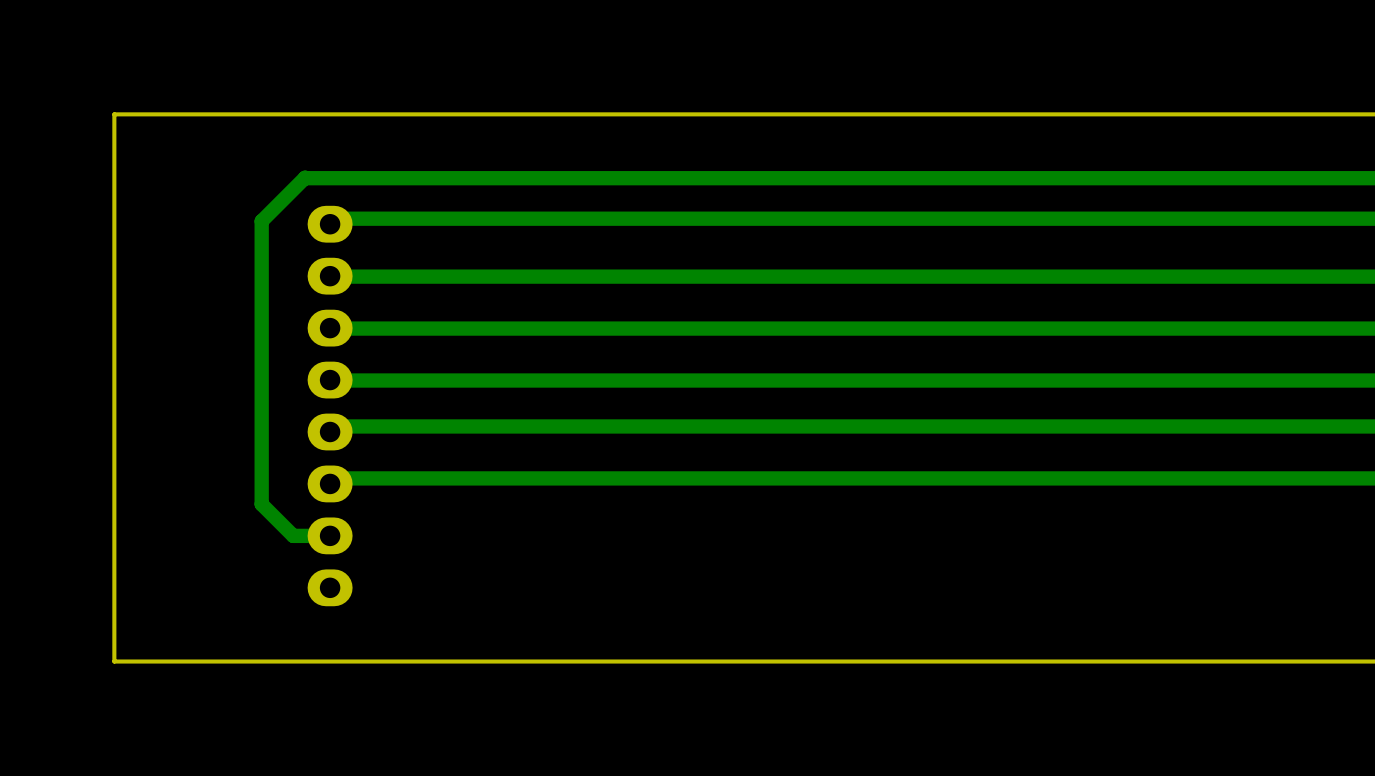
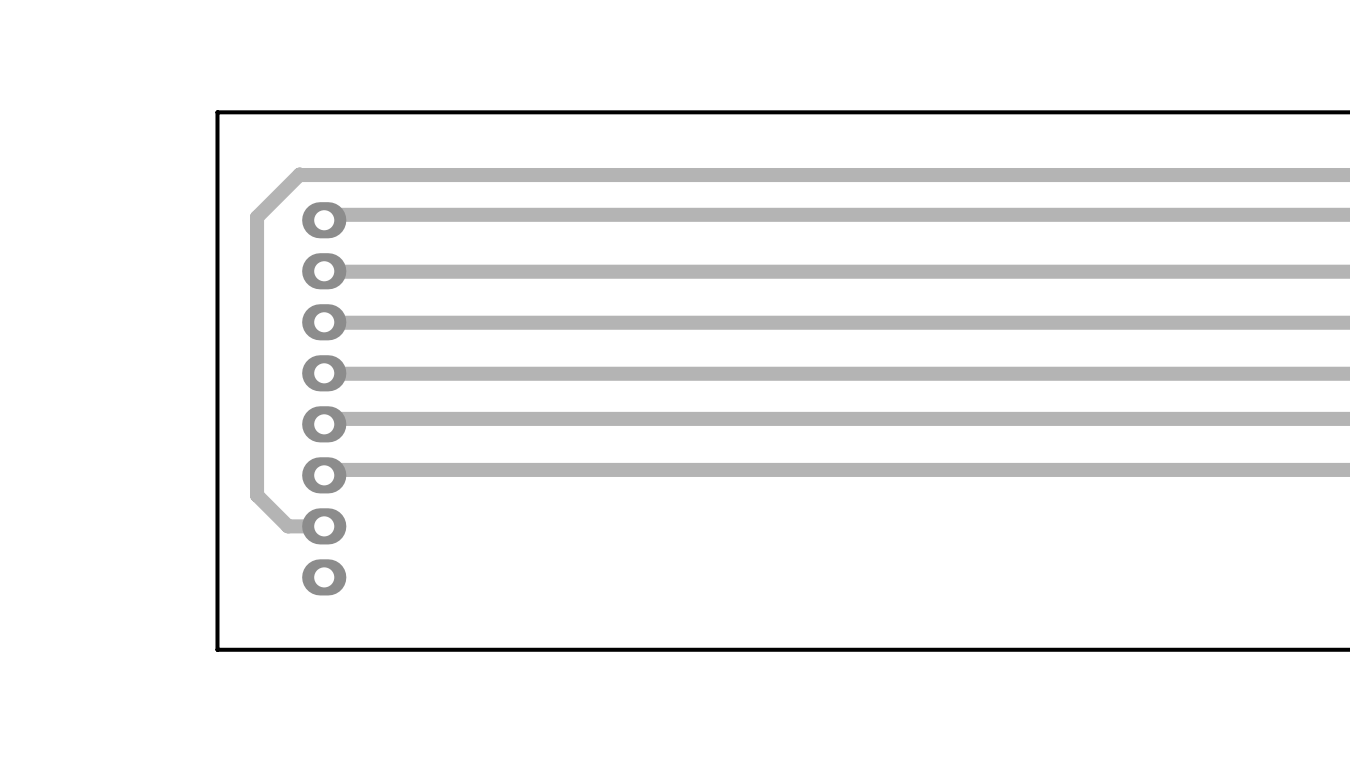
board edge: (221, 114) (114, 114) (114, 661) (221, 661) -> (217, 112) (217, 649)

